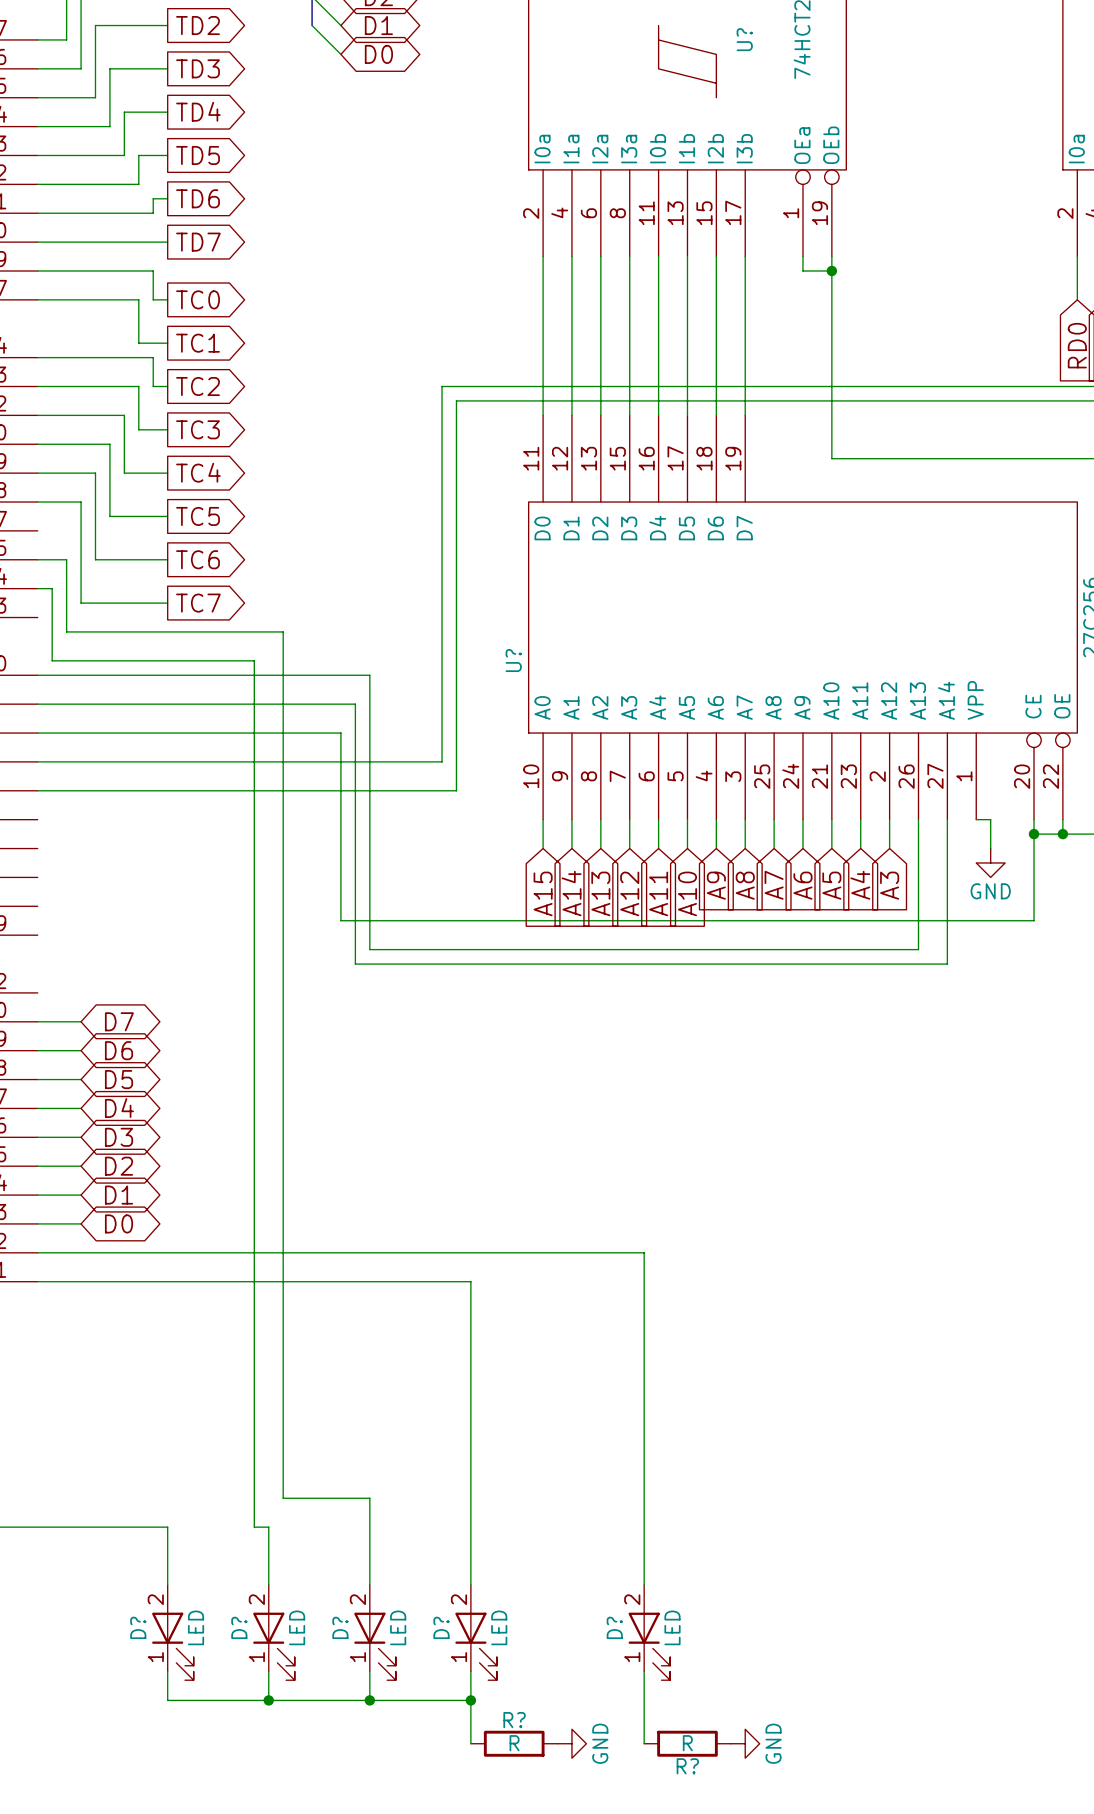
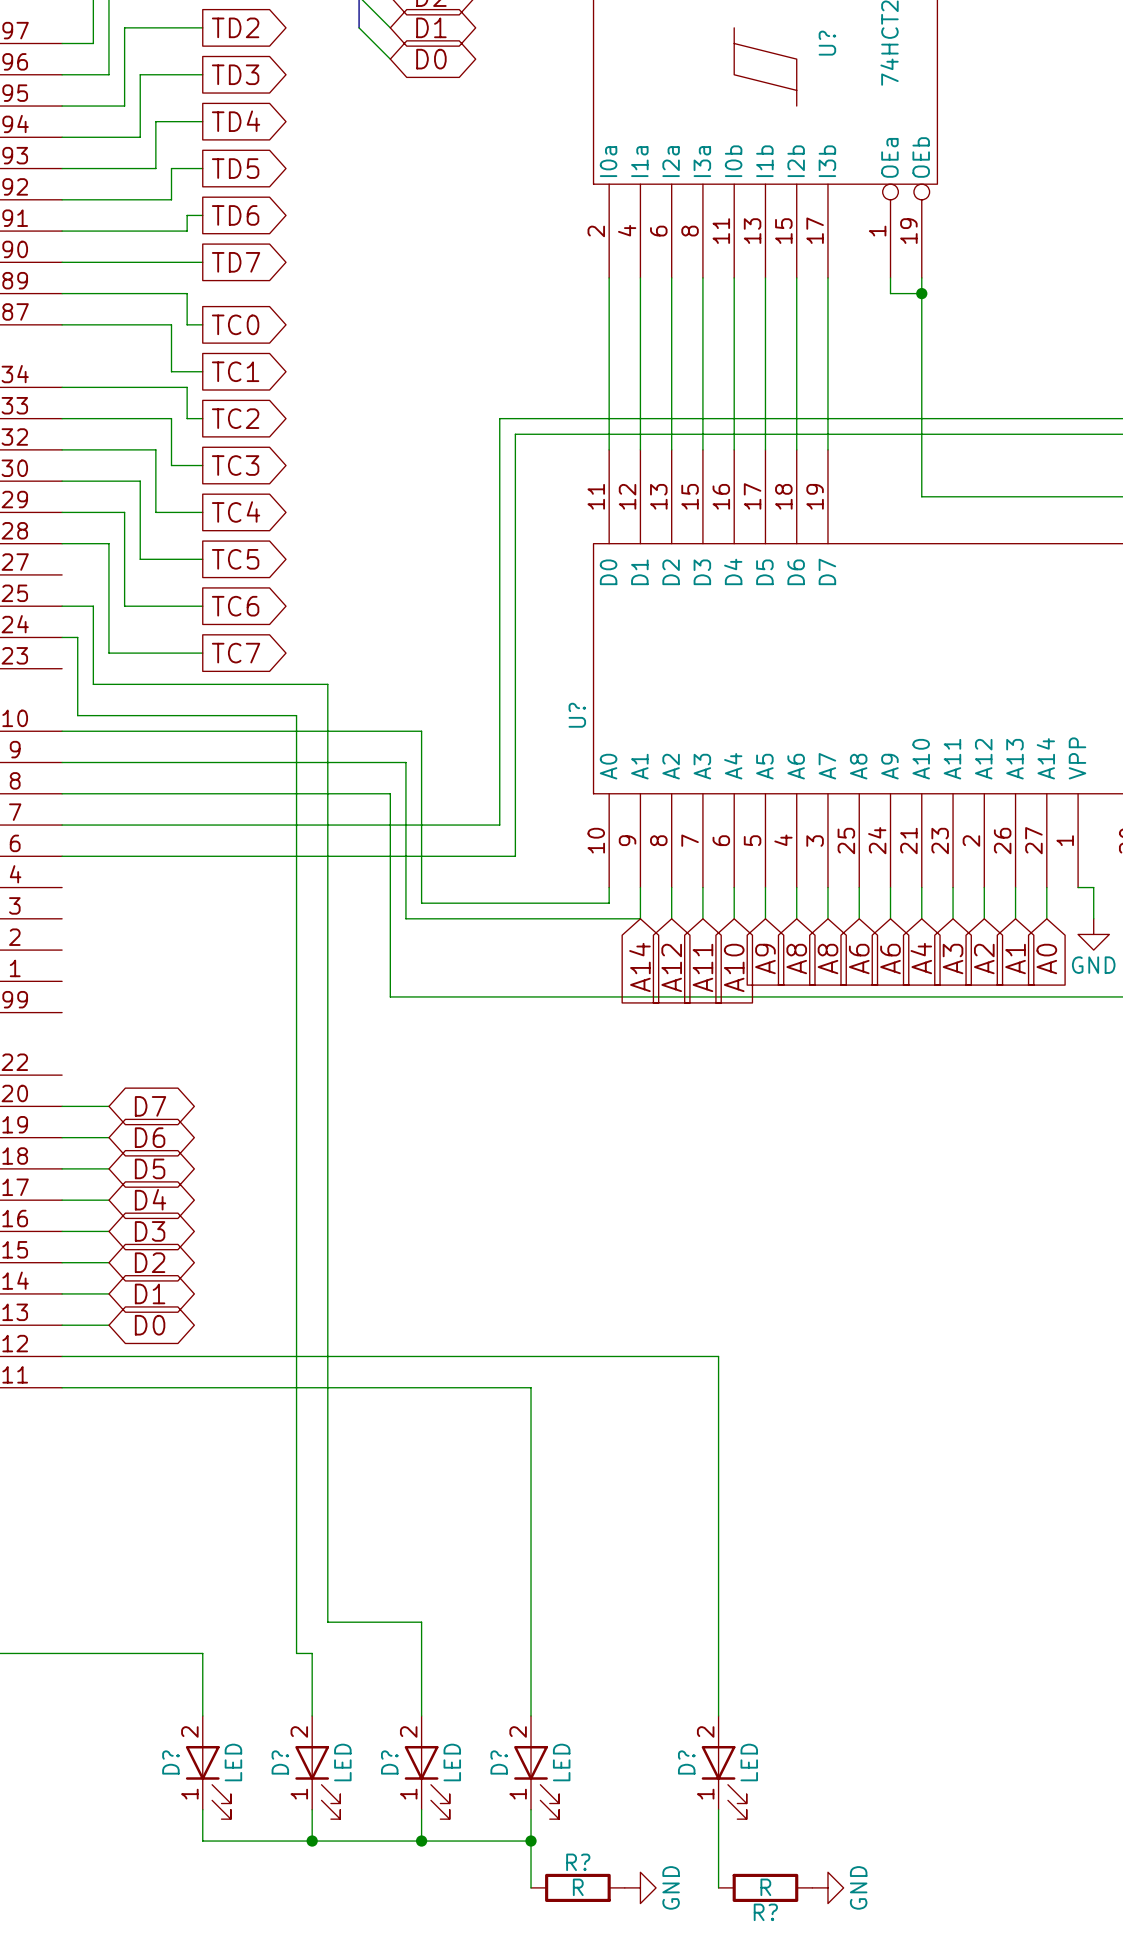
wire: (369, 834) (369, 949) (918, 949) (918, 848) -> none
wire: (543, 834) (543, 848) -> (609, 903) (421, 903)
wire: (355, 848) (355, 964) (947, 964) (947, 848) -> (405, 918) (640, 918)
global label: A9 (716, 885) -> A8 (796, 959)
global label: A7 (774, 885) -> A6 (859, 959)
global label: A5 (831, 885) -> A4 (921, 958)
global label: A4 (860, 885) -> A3 (953, 959)
global label: A3 (889, 885) -> A2 (984, 959)
global label: none -> A1 (1015, 959)
global label: none -> A0 (1046, 959)
global label: A15 (543, 893) -> none
global label: A13 (600, 893) -> A12 (671, 967)
global label: A12 (629, 893) -> A11 (702, 967)
global label: A11 (658, 893) -> A10 (734, 967)
global label: A10 (687, 893) -> A9 (765, 959)

